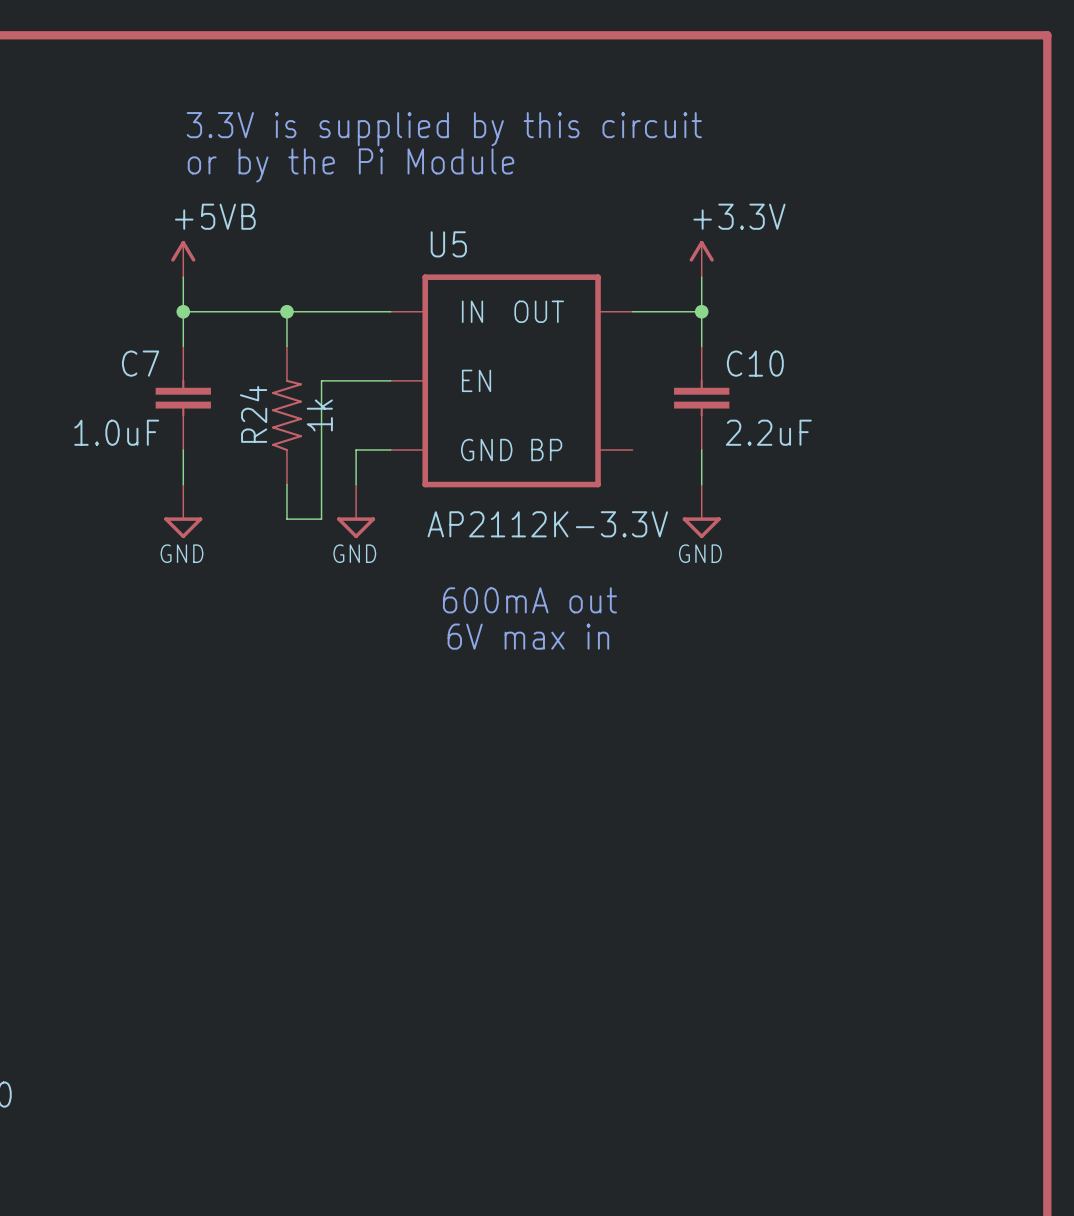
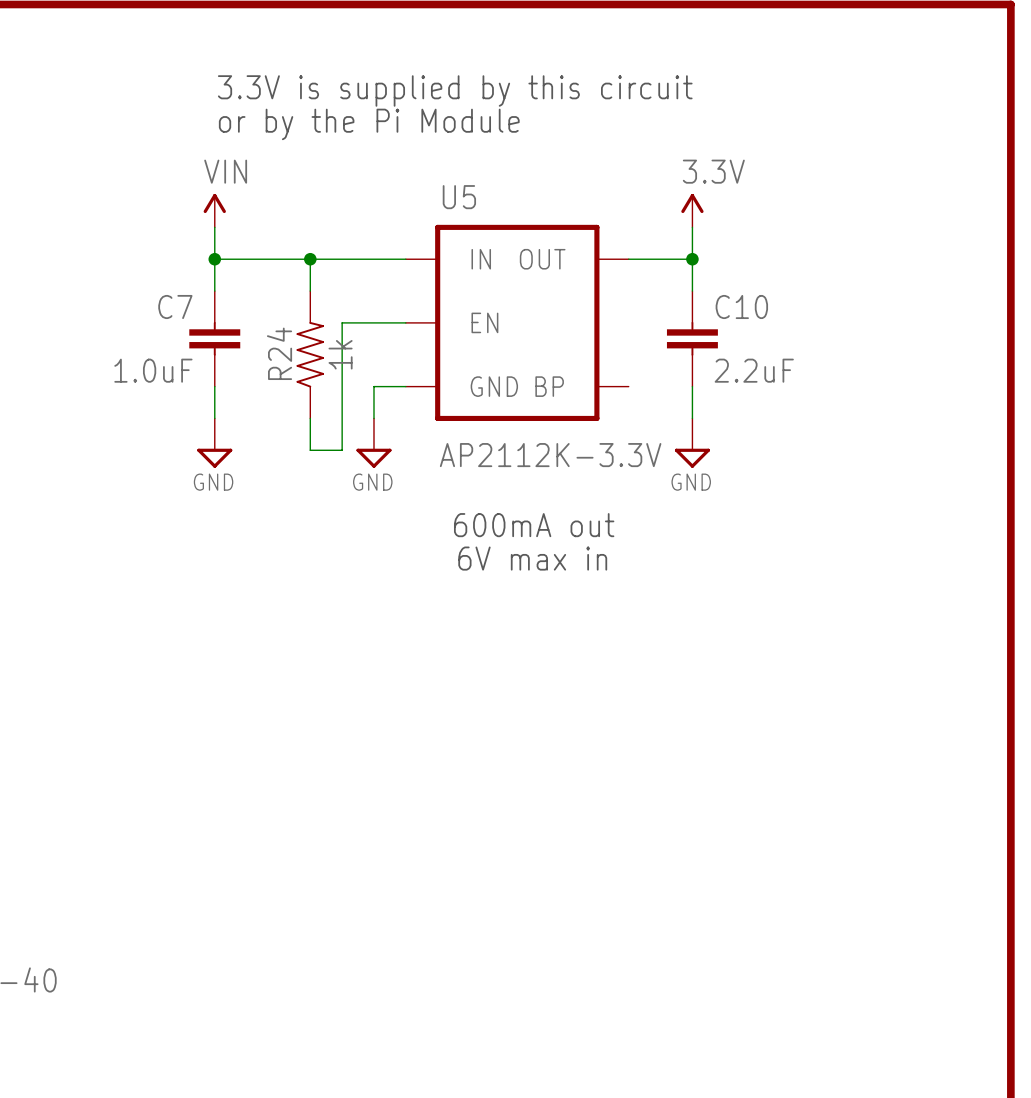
power symbol: +5VB (183, 259) -> VIN (214, 210)
power symbol: +3.3V (701, 259) -> 3.3V (692, 210)

